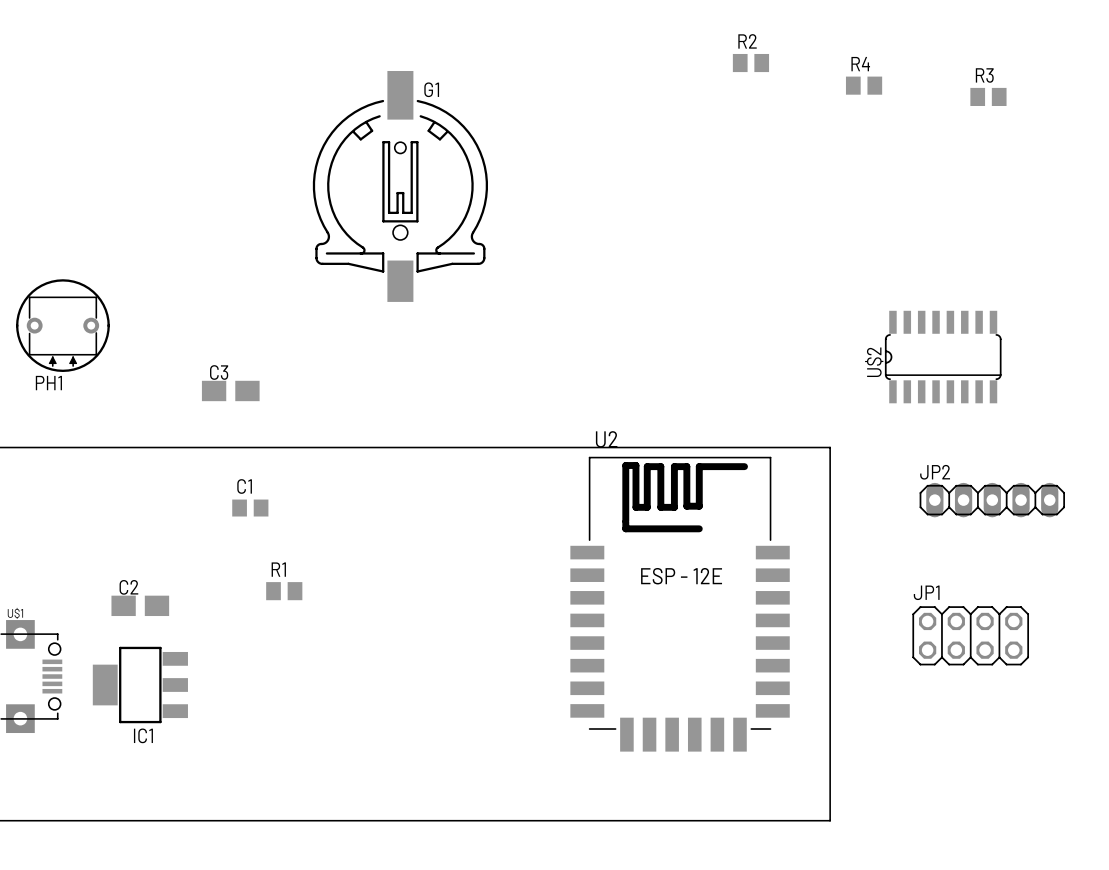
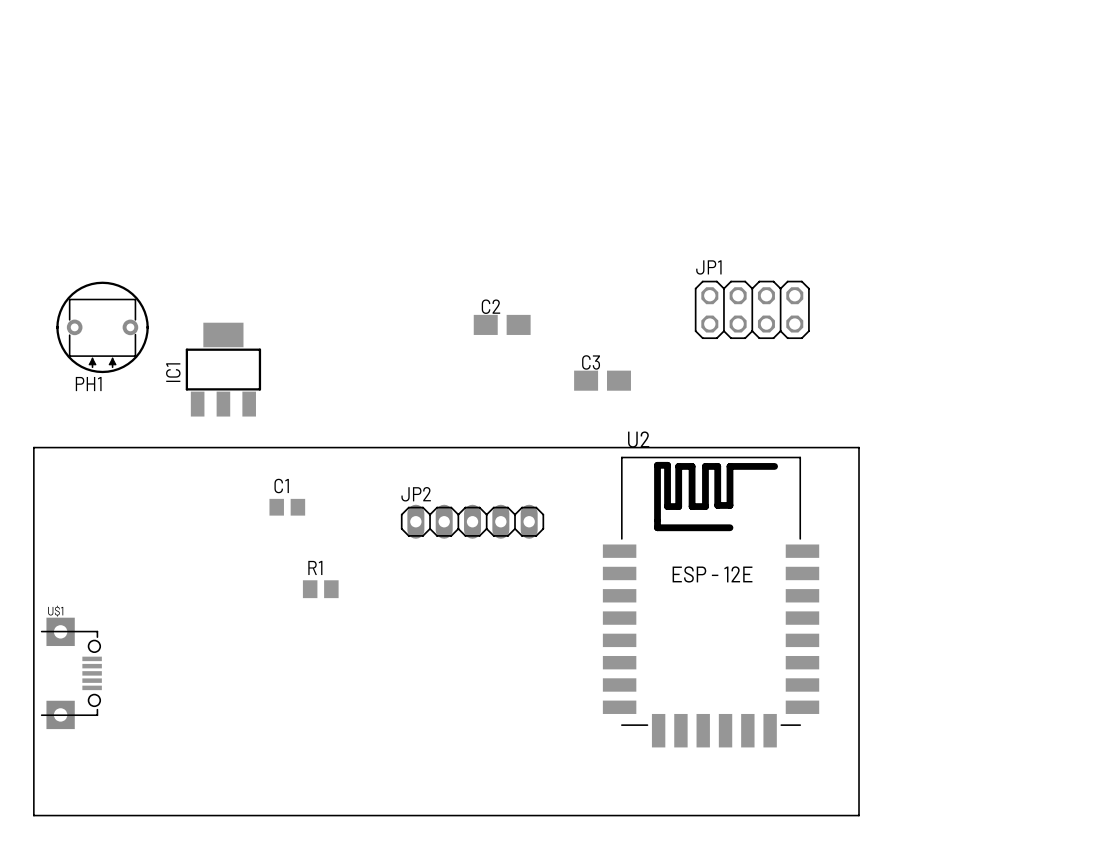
R2: (750, 63) -> none
R4: (864, 85) -> none
R3: (988, 96) -> none
G1: (400, 186) -> none
U$2: (943, 357) -> none
C3 position: (230, 390) -> (602, 380)
JP2 position: (992, 500) -> (472, 521)
C2 position: (140, 605) -> (502, 324)
JP1 position: (970, 635) -> (752, 309)
IC1 rotation: 0° (140, 685) -> 90° clockwise (223, 369)
IC1 position: (140, 685) -> (223, 369)

